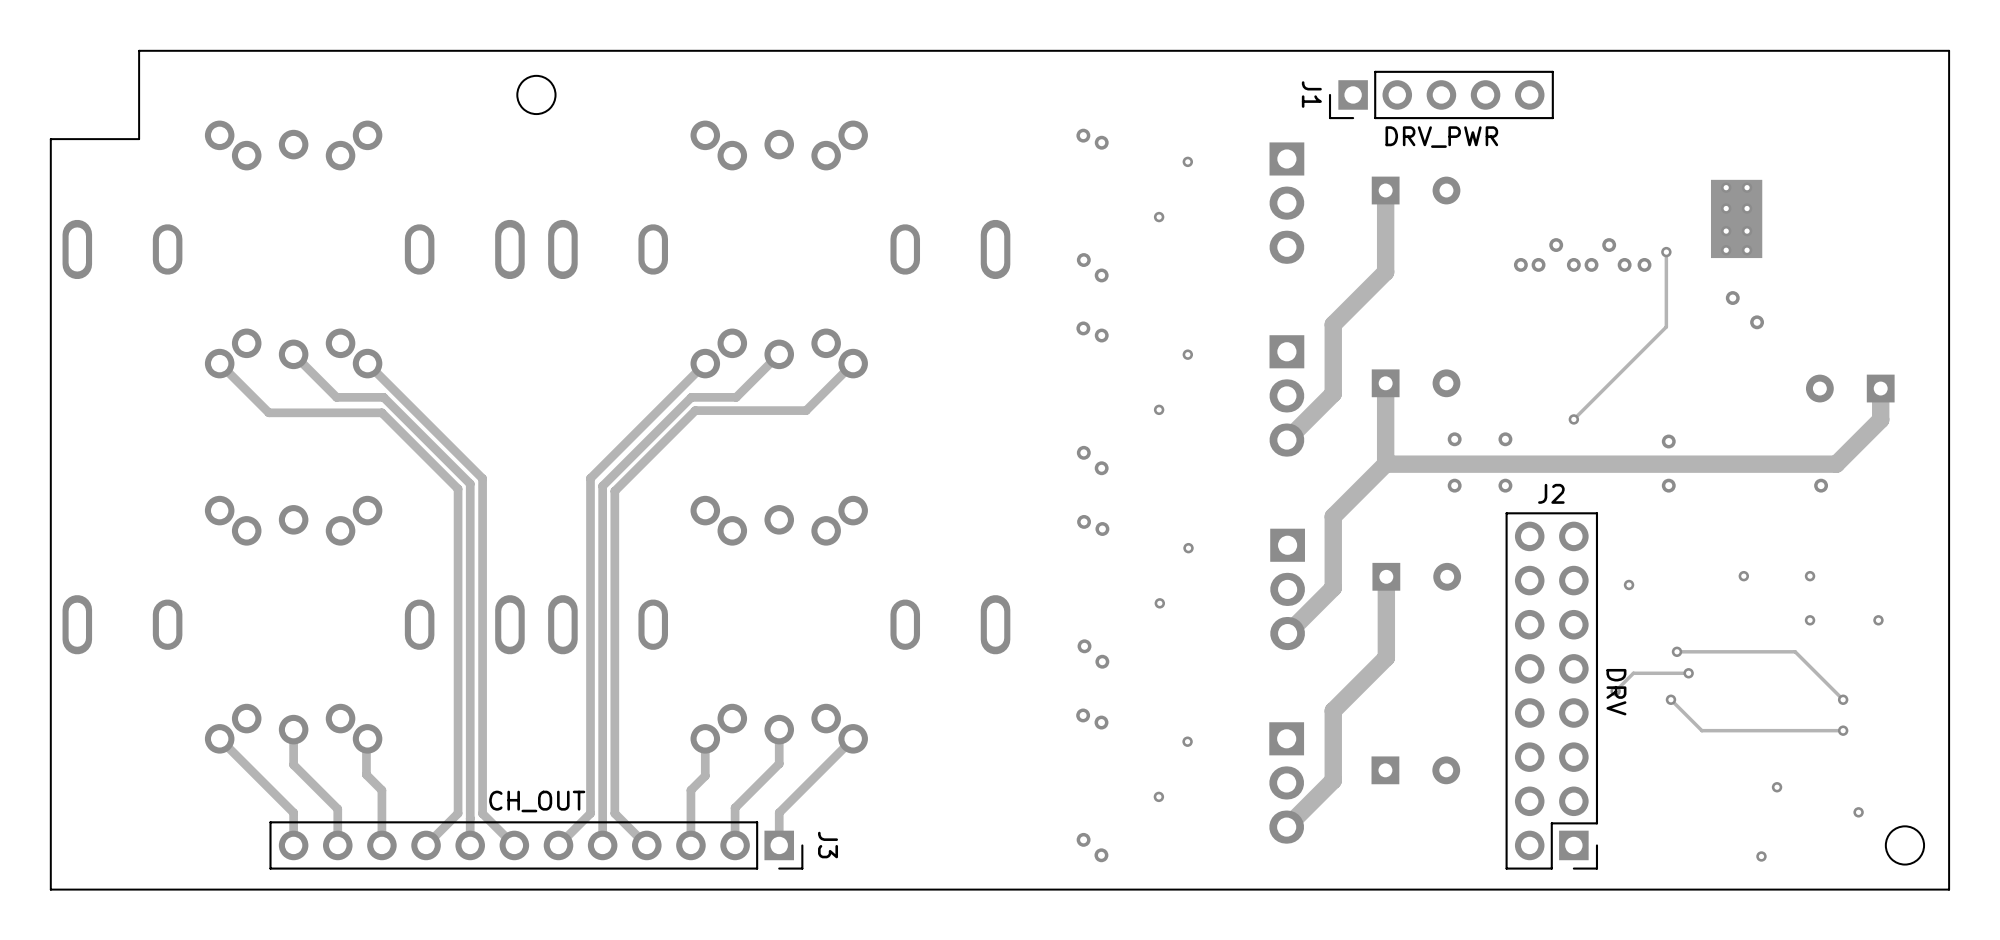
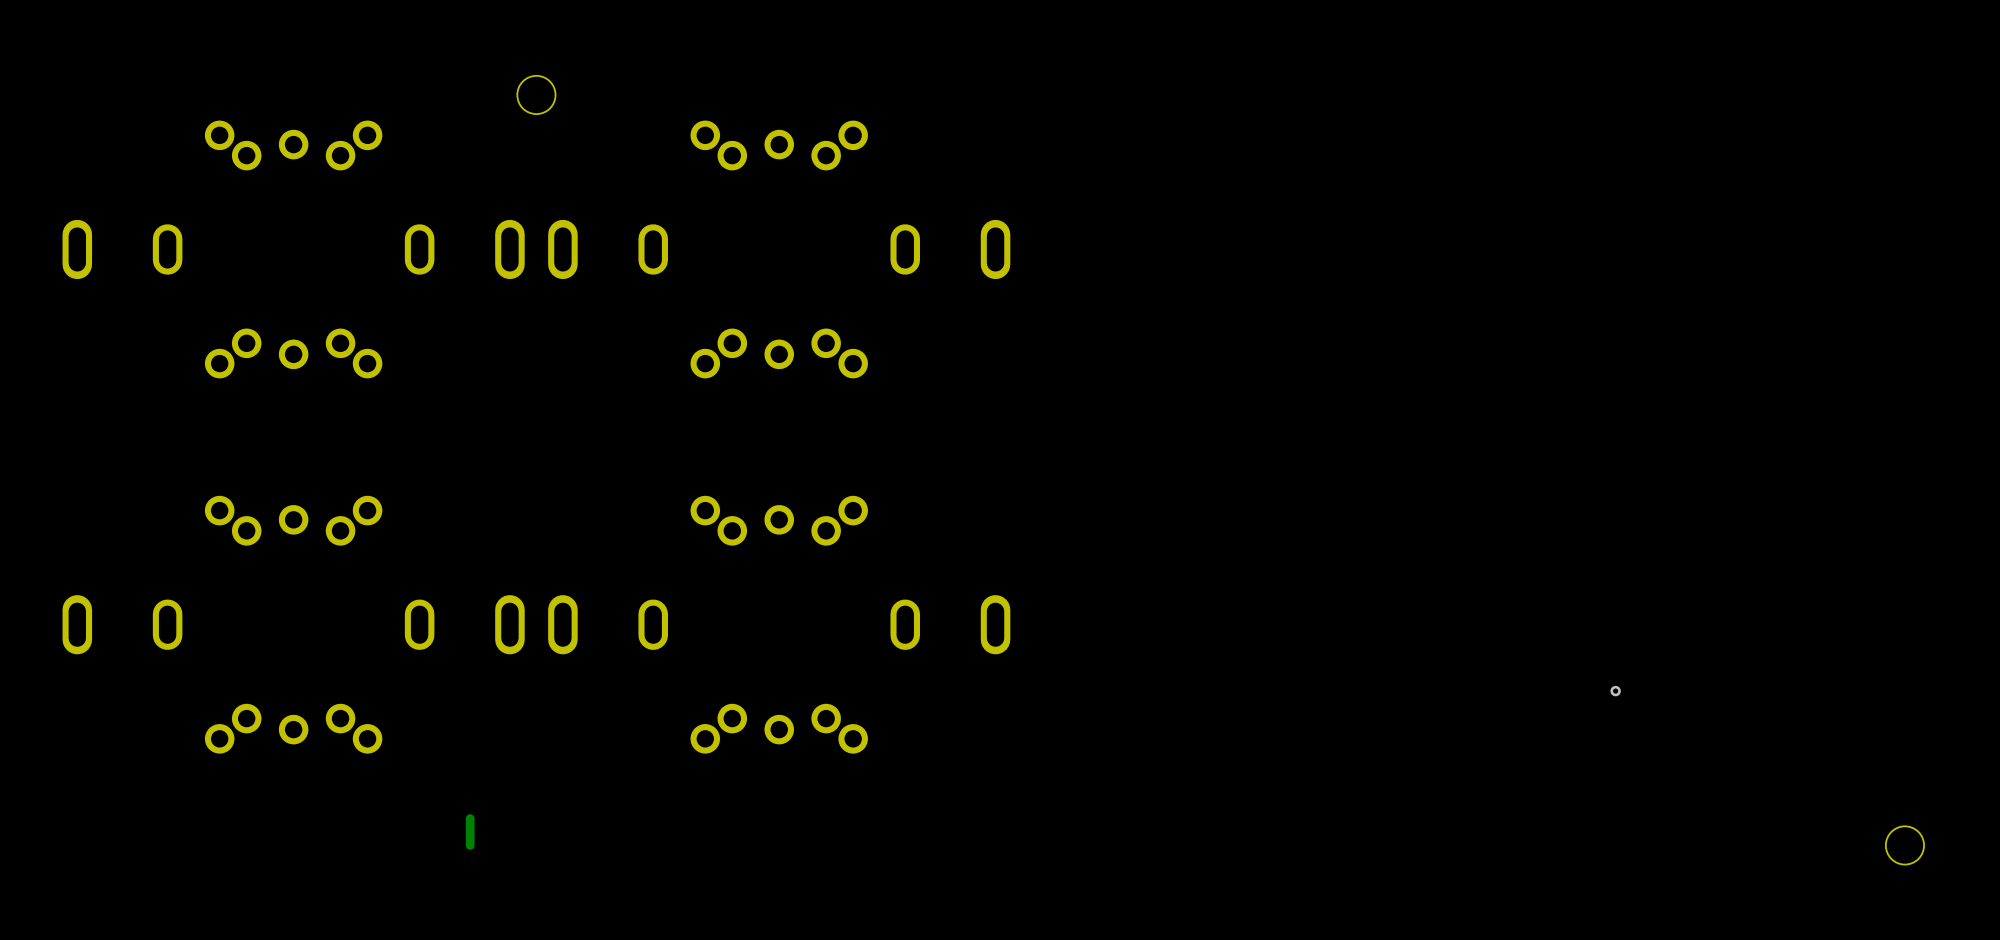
board edge: (1949, 50) (139, 50) (139, 139) (50, 139) (50, 889) (1949, 889) (1949, 50) -> none
J1: DRV_PWR (1441, 94) -> none
via: (1083, 135) -> none
via: (1101, 142) -> none
via: (1187, 161) -> none
track: (1385, 190) (1385, 272) (1333, 324) (1333, 393) (1286, 440) -> none
part: (1416, 190) -> none
part: (1286, 203) -> none
via: (1159, 217) -> none
part: (1736, 218) -> none
via: (1556, 245) -> none
via: (1609, 245) -> none
track: (1666, 252) (1666, 326) (1573, 419) -> none
via: (1666, 252) -> none
via: (1083, 260) -> none
via: (1520, 264) -> none
via: (1538, 264) -> none
via: (1573, 264) -> none
via: (1591, 264) -> none
via: (1624, 264) -> none
via: (1644, 264) -> none
via: (1101, 275) -> none
via: (1732, 298) -> none
via: (1757, 322) -> none
via: (1083, 328) -> none
via: (1101, 335) -> none
track: (293, 354) (336, 397) (383, 397) (470, 483) (470, 818) -> none
track: (779, 354) (736, 397) (691, 397) (602, 486) (602, 845) -> none
via: (1187, 354) -> none
track: (219, 363) (268, 412) (381, 412) (458, 488) (458, 813) (426, 845) -> none
track: (367, 363) (482, 478) (482, 813) (514, 845) -> none
track: (705, 363) (590, 478) (590, 813) (558, 845) -> none
track: (853, 363) (806, 410) (695, 410) (614, 491) (614, 813) (646, 845) -> none
part: (1416, 383) -> none
track: (1386, 384) (1385, 464) -> none
part: (1850, 388) -> none
track: (1880, 388) (1880, 419) (1836, 464) (1385, 464) -> none
part: (1286, 395) -> none
via: (1159, 409) -> none
via: (1573, 419) -> none
via: (1454, 439) -> none
via: (1505, 439) -> none
via: (1668, 441) -> none
via: (1083, 452) -> none
track: (1385, 464) (1333, 516) (1333, 587) (1287, 633) -> none
via: (1101, 468) -> none
via: (1454, 485) -> none
via: (1505, 485) -> none
via: (1668, 485) -> none
via: (1821, 485) -> none
via: (1084, 521) -> none
via: (1102, 529) -> none
via: (1188, 548) -> none
part: (1416, 576) -> none
via: (1743, 576) -> none
via: (1810, 576) -> none
track: (1385, 577) (1386, 657) (1333, 710) (1333, 780) (1286, 827) -> none
via: (1629, 584) -> none
part: (1287, 589) -> none
via: (1159, 603) -> none
via: (1810, 620) -> none
via: (1878, 620) -> none
via: (1084, 646) -> none
track: (1677, 651) (1795, 651) (1843, 699) -> none
via: (1677, 651) -> none
via: (1102, 661) -> none
track: (1688, 673) (1633, 673) (1615, 691) -> none
via: (1688, 673) -> none
J2: DRV (1551, 690) -> none
track: (1670, 699) (1701, 730) (1843, 730) -> none
via: (1670, 699) -> none
via: (1843, 699) -> none
via: (1083, 715) -> none
via: (1101, 722) -> none
track: (293, 729) (293, 764) (337, 809) (337, 845) -> none
track: (779, 729) (779, 763) (735, 807) (735, 845) -> none
via: (1843, 730) -> none
track: (219, 738) (293, 812) (293, 845) -> none
track: (367, 738) (366, 774) (381, 790) (381, 845) -> none
track: (705, 738) (705, 775) (690, 790) (690, 845) -> none
track: (853, 738) (779, 812) (779, 845) -> none
via: (1187, 741) -> none
part: (1415, 770) -> none
part: (1286, 782) -> none
via: (1777, 787) -> none
via: (1158, 796) -> none
via: (1858, 812) -> none
via: (1083, 839) -> none
J3: CH_OUT (536, 845) -> none
via: (1101, 855) -> none
via: (1761, 856) -> none

